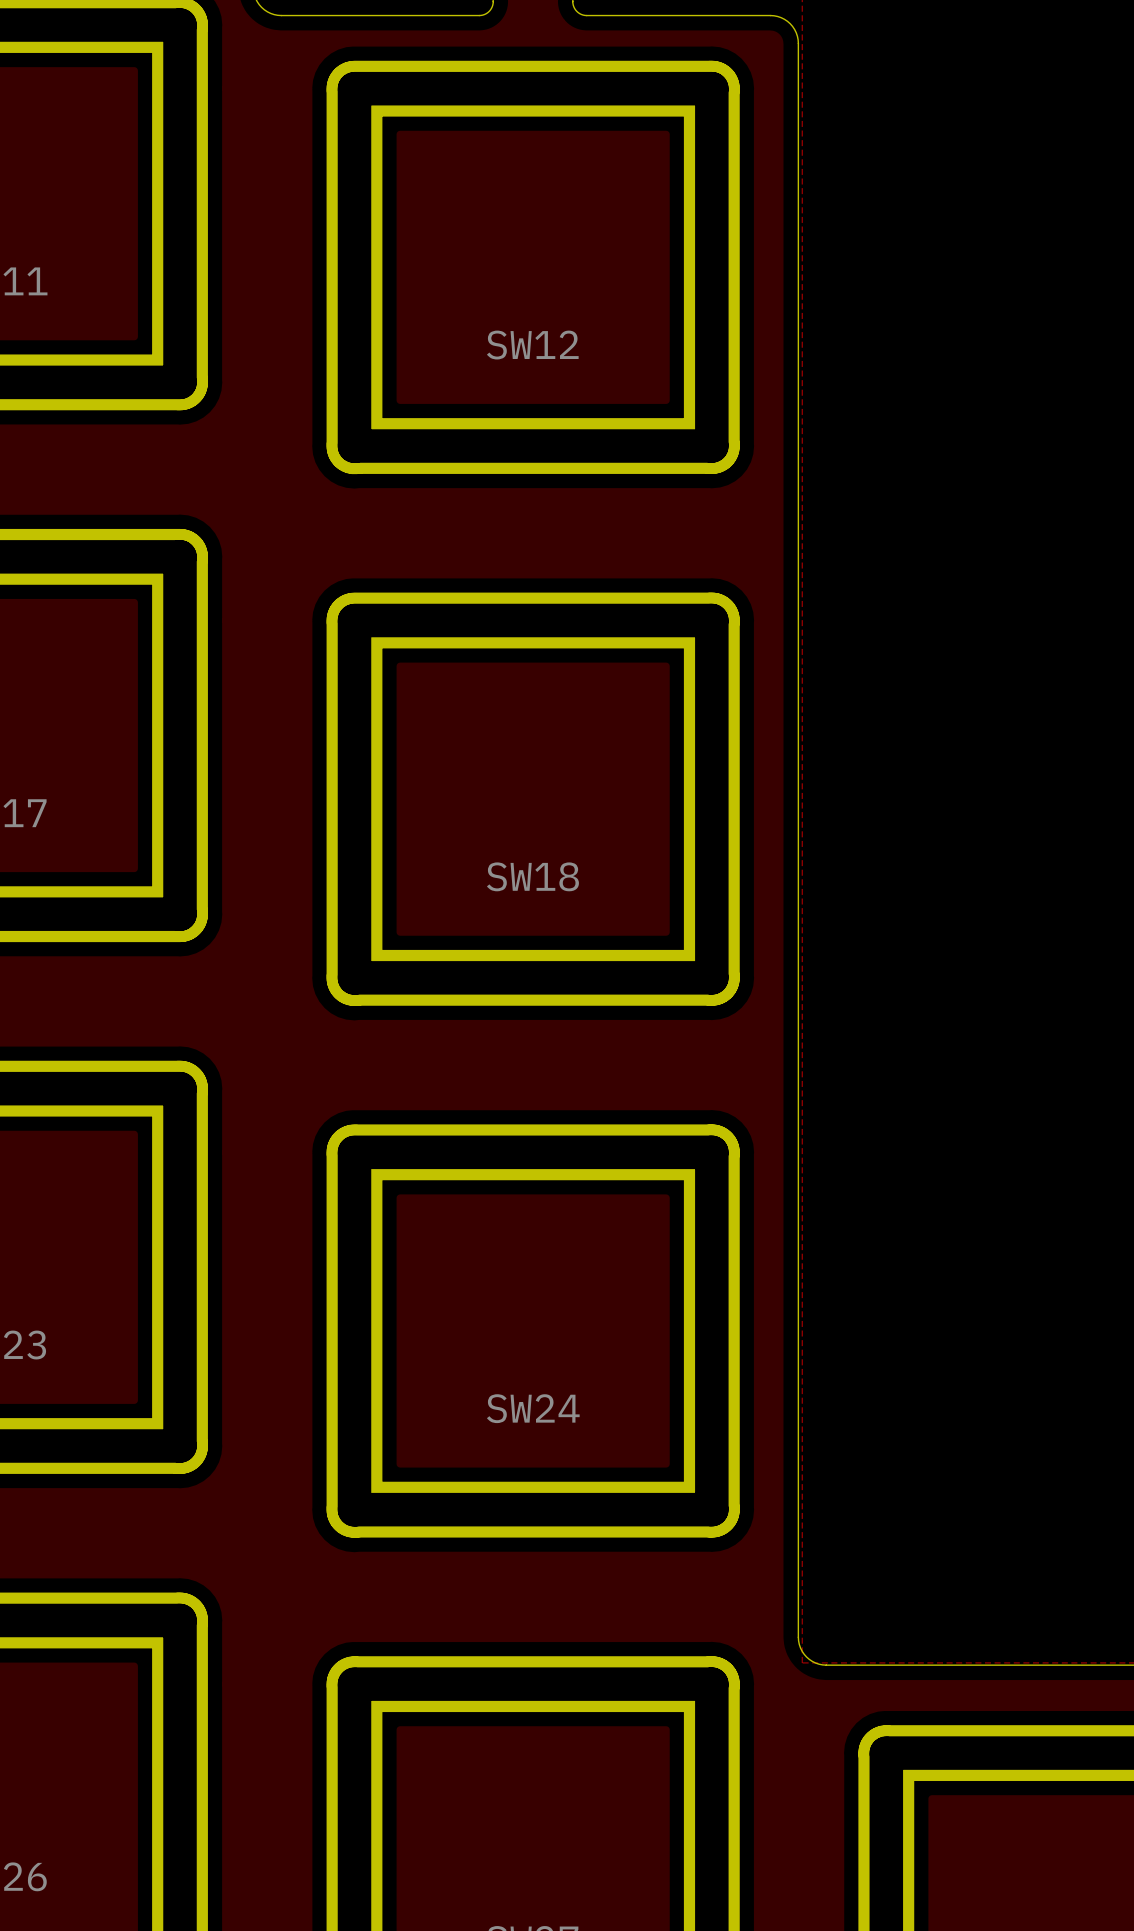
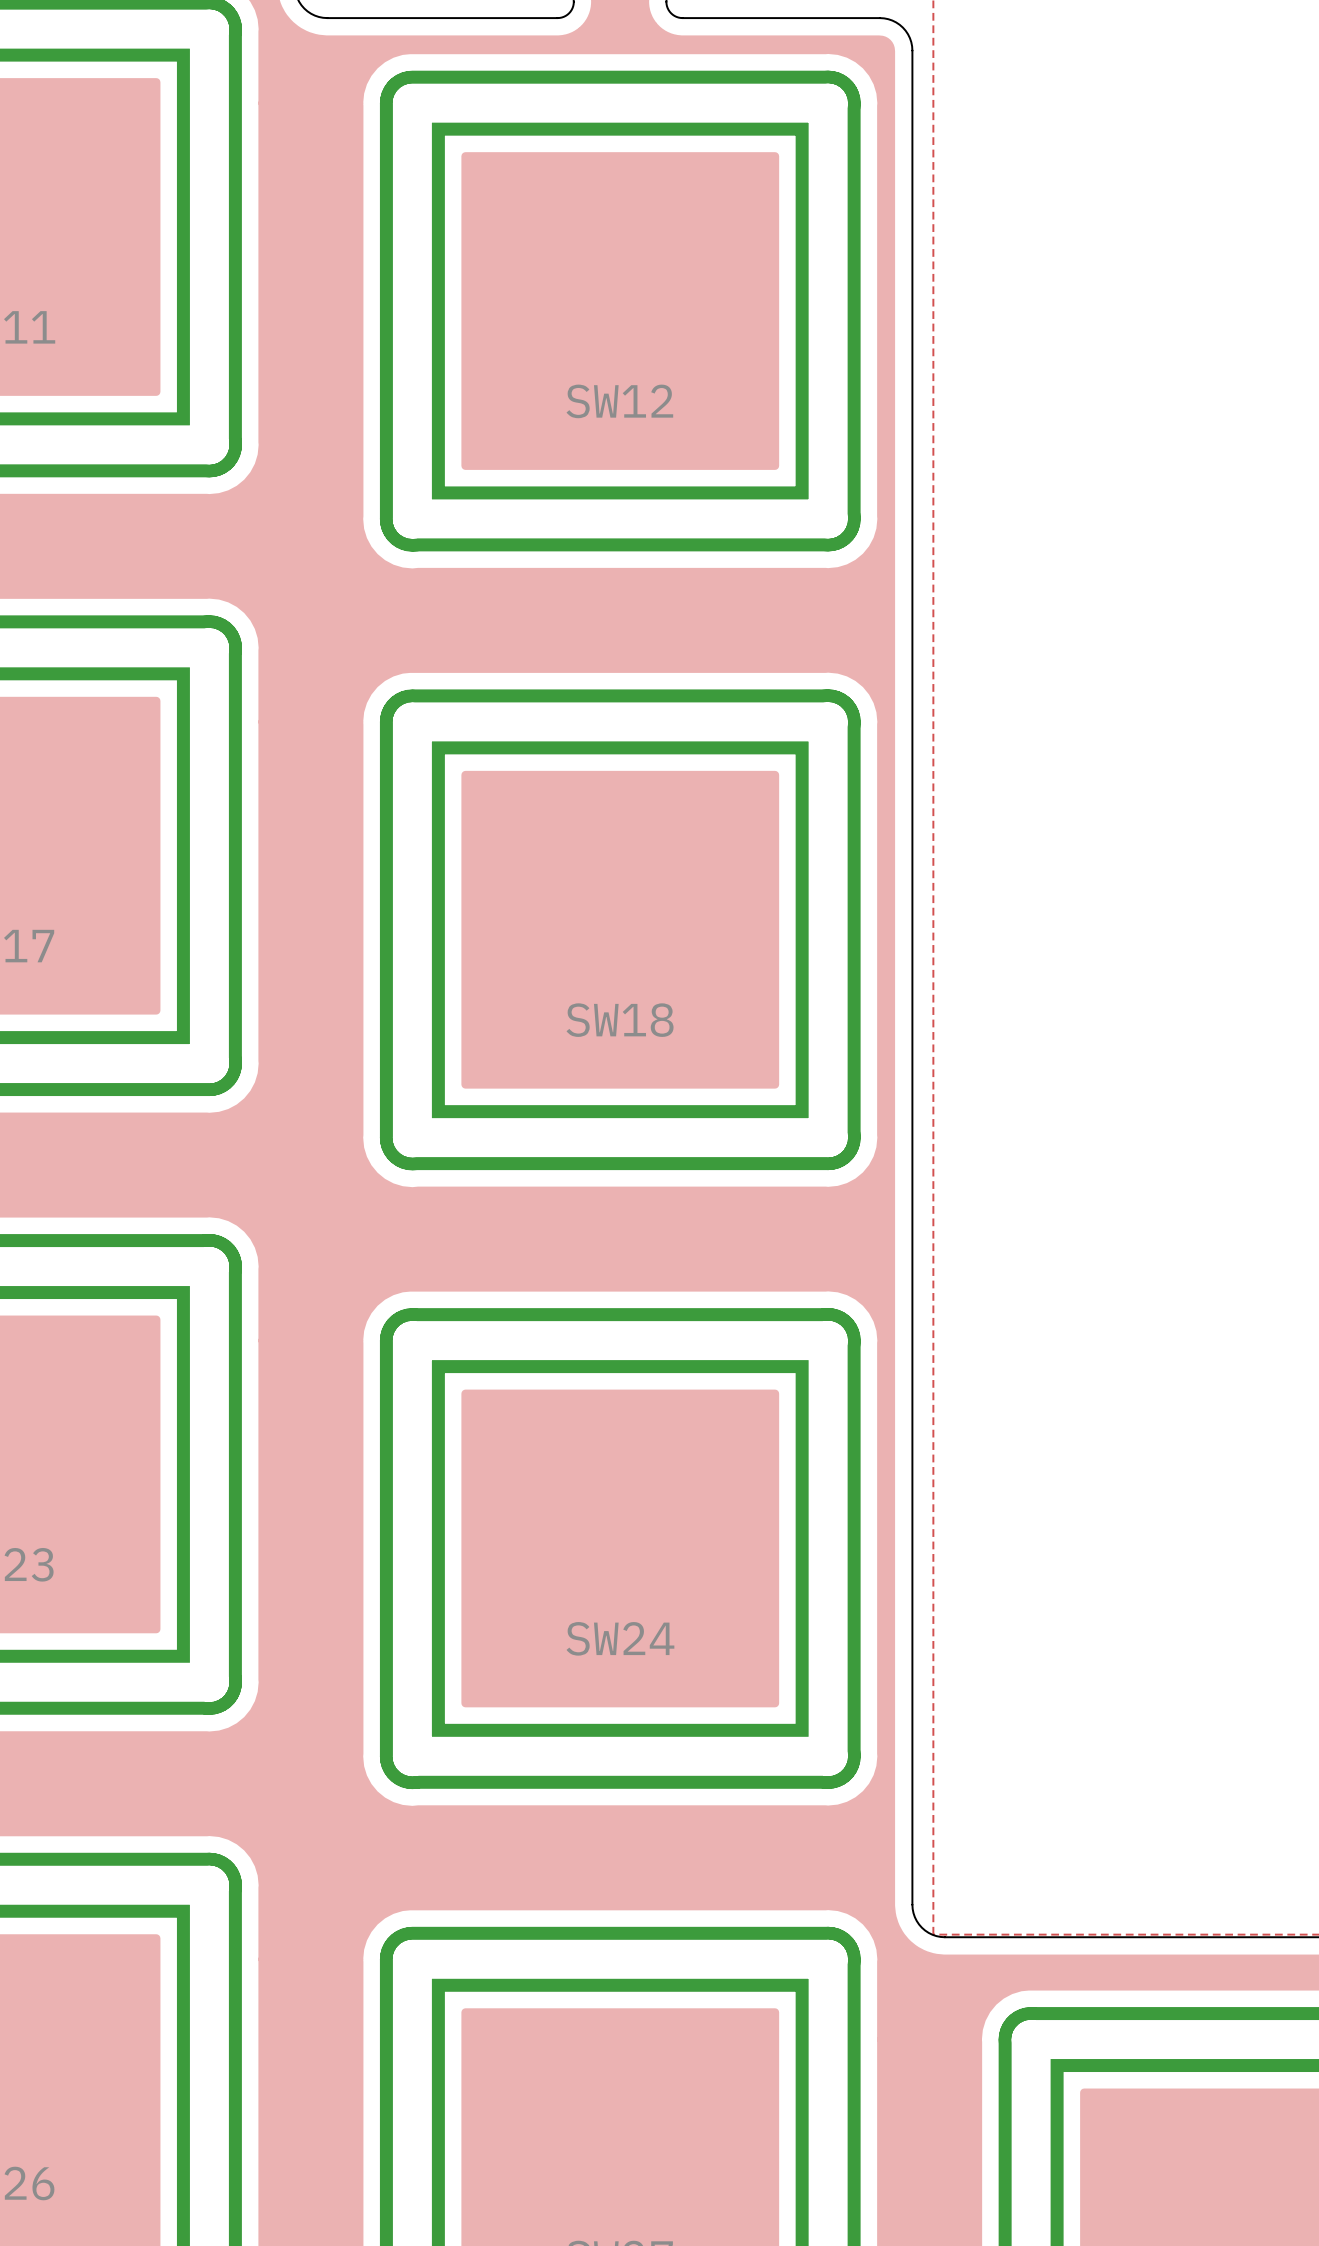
board edge: (756, 15) (774, 15) (784, 19) (794, 29) (798, 43) (798, 1637) (800, 1647) (806, 1656) (815, 1663) (826, 1665) -> (879, 18) (892, 20) (902, 27) (909, 38) (912, 50) (912, 1904) (916, 1920) (928, 1932) (940, 1936) (961, 1937)

